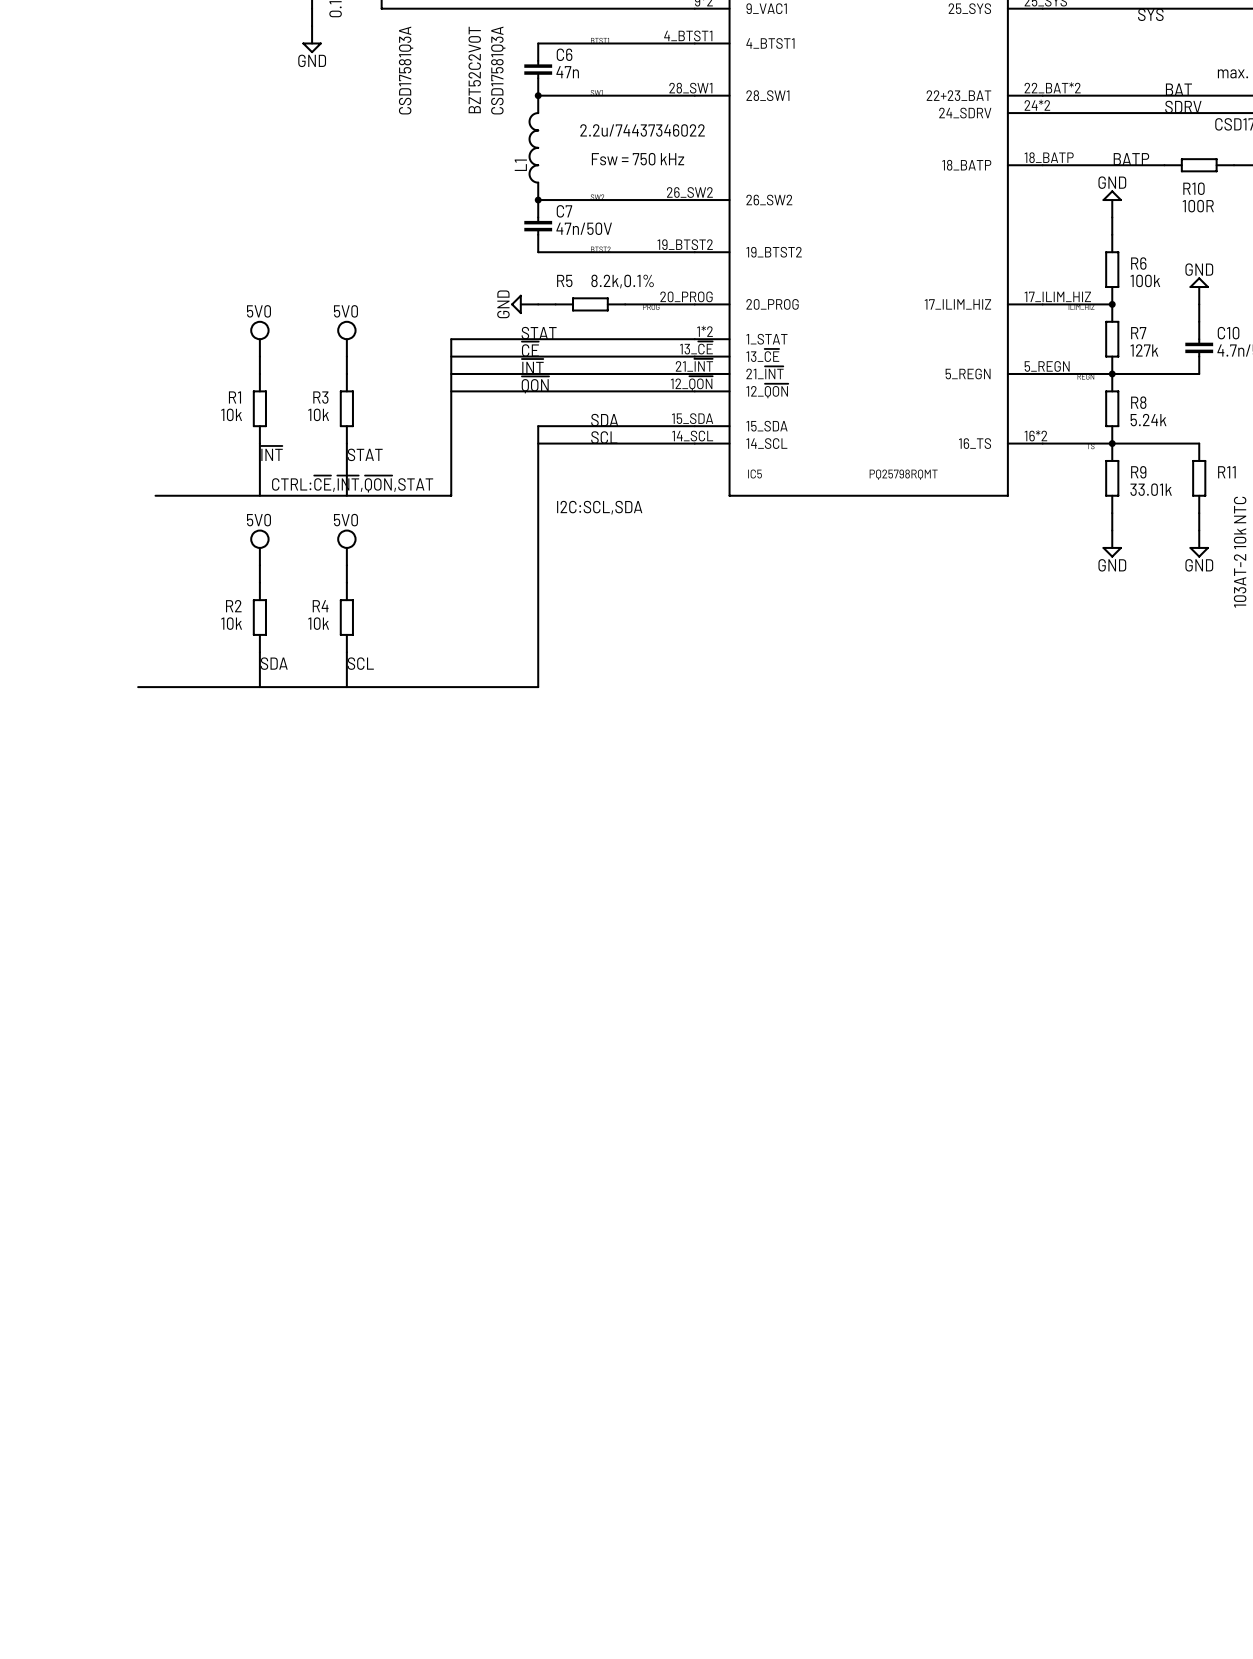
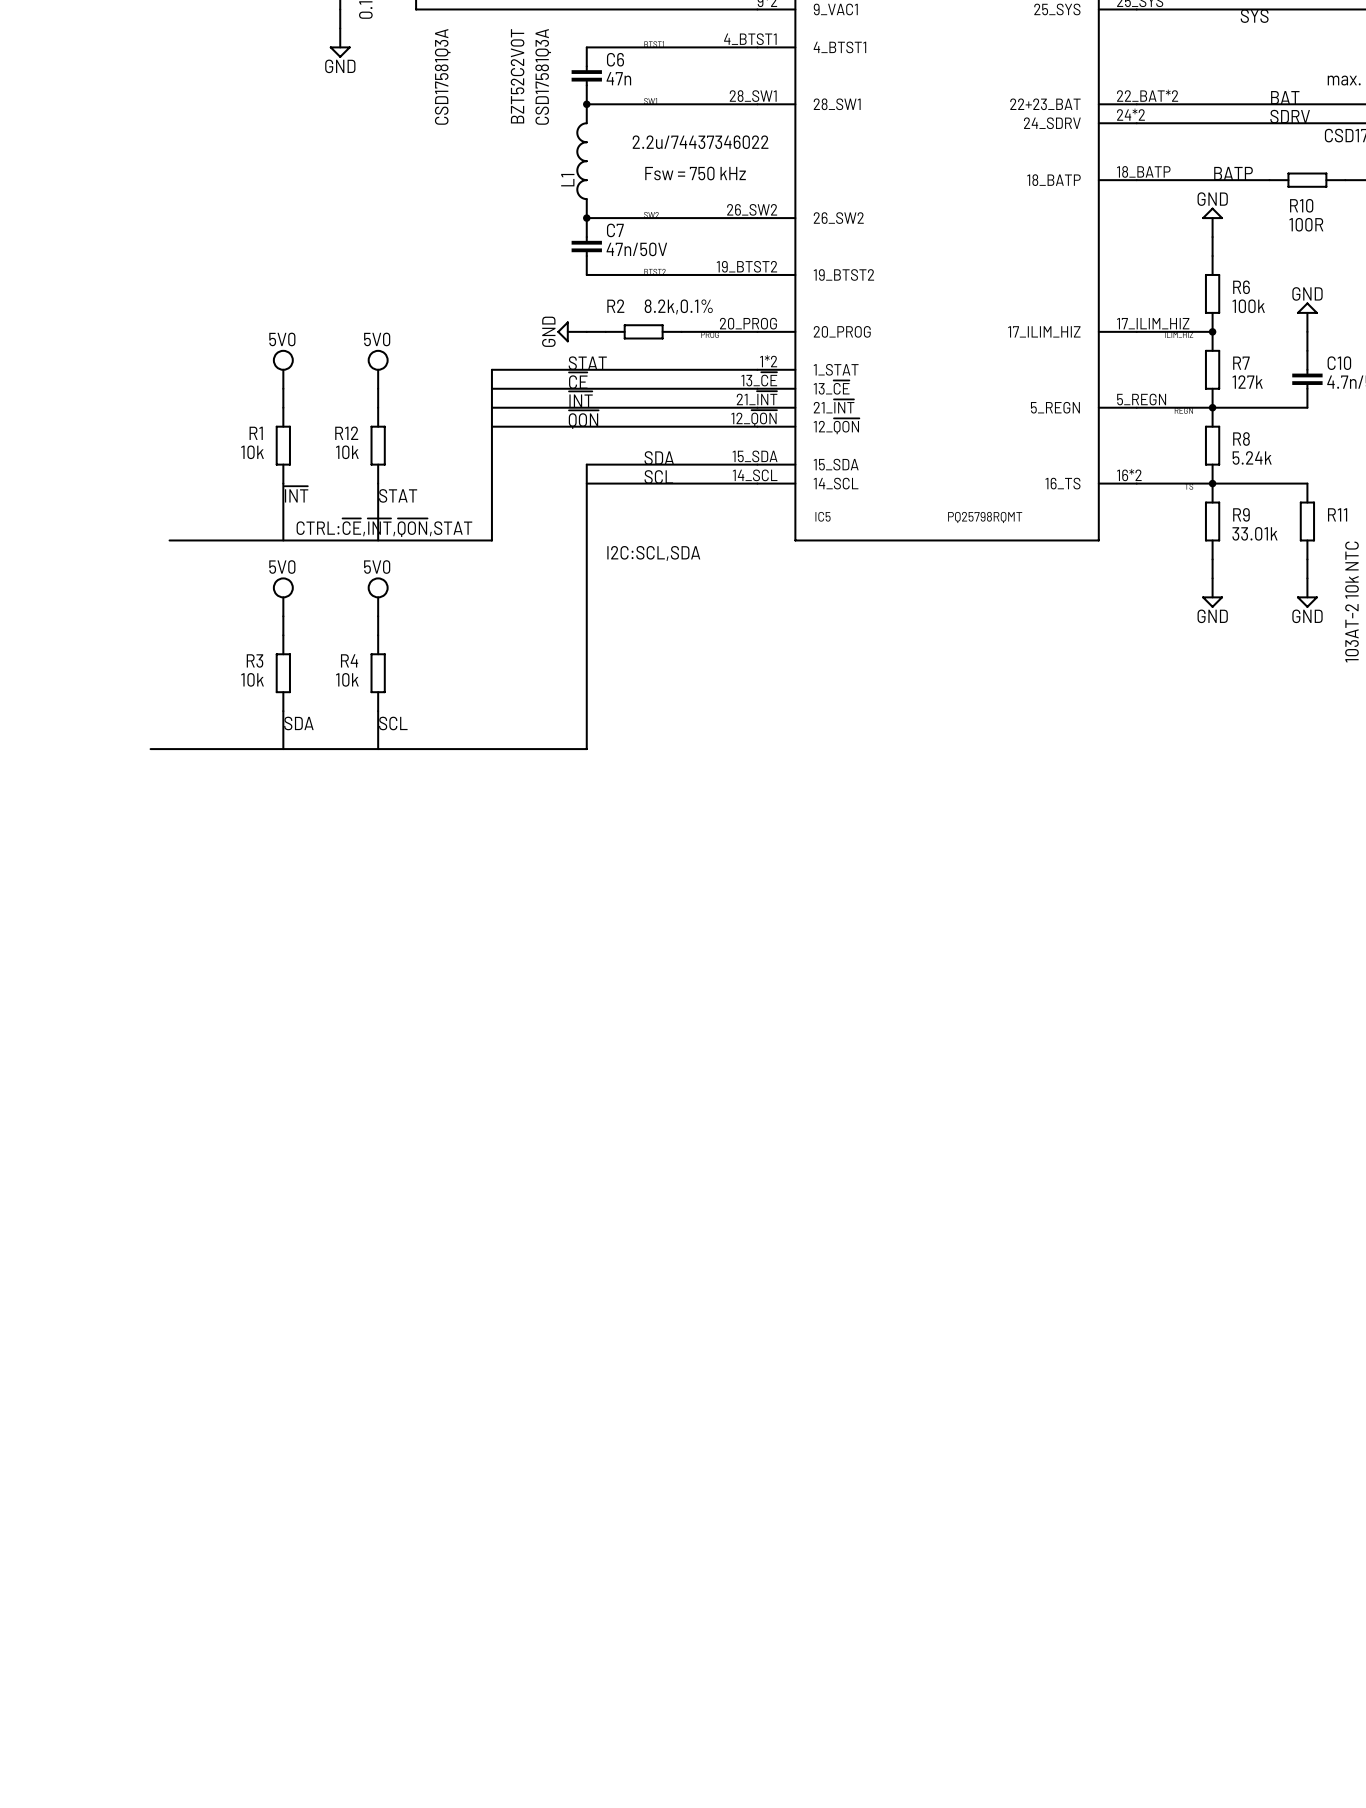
R5 name: R5 (564, 280) -> R2 (615, 306)
R3 name: R3 (320, 397) -> R12 (346, 433)
R2 name: R2 (233, 606) -> R3 (255, 660)

